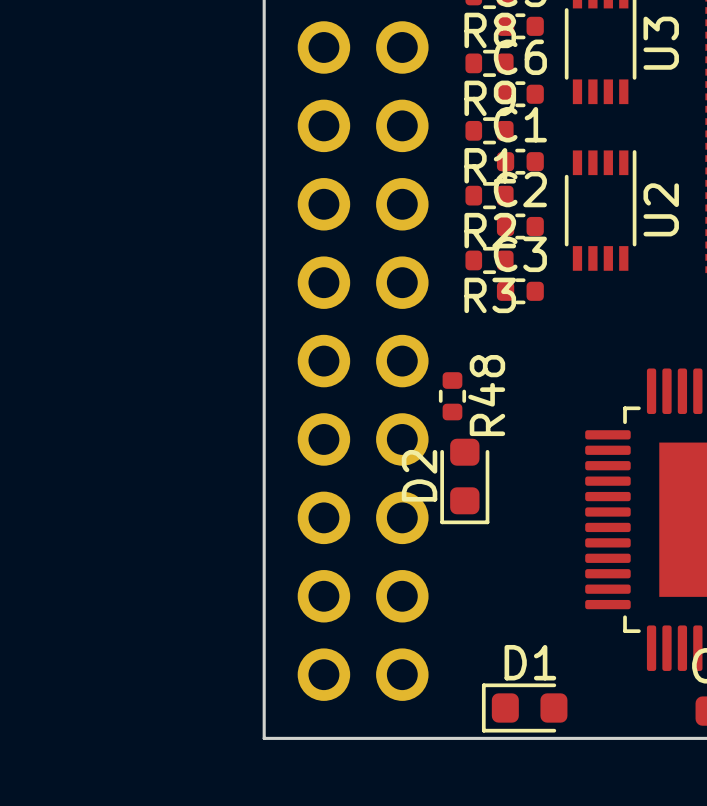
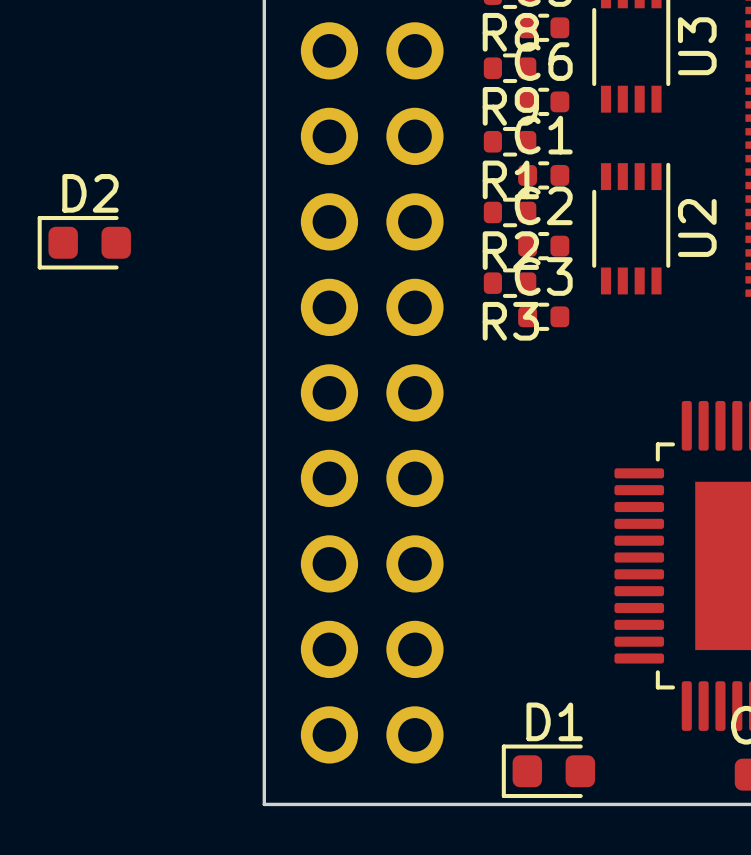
R48: (452, 396) -> none
D2 rotation: 0° (464, 481) -> 90° clockwise (84, 242)
D2 position: (464, 481) -> (84, 242)

